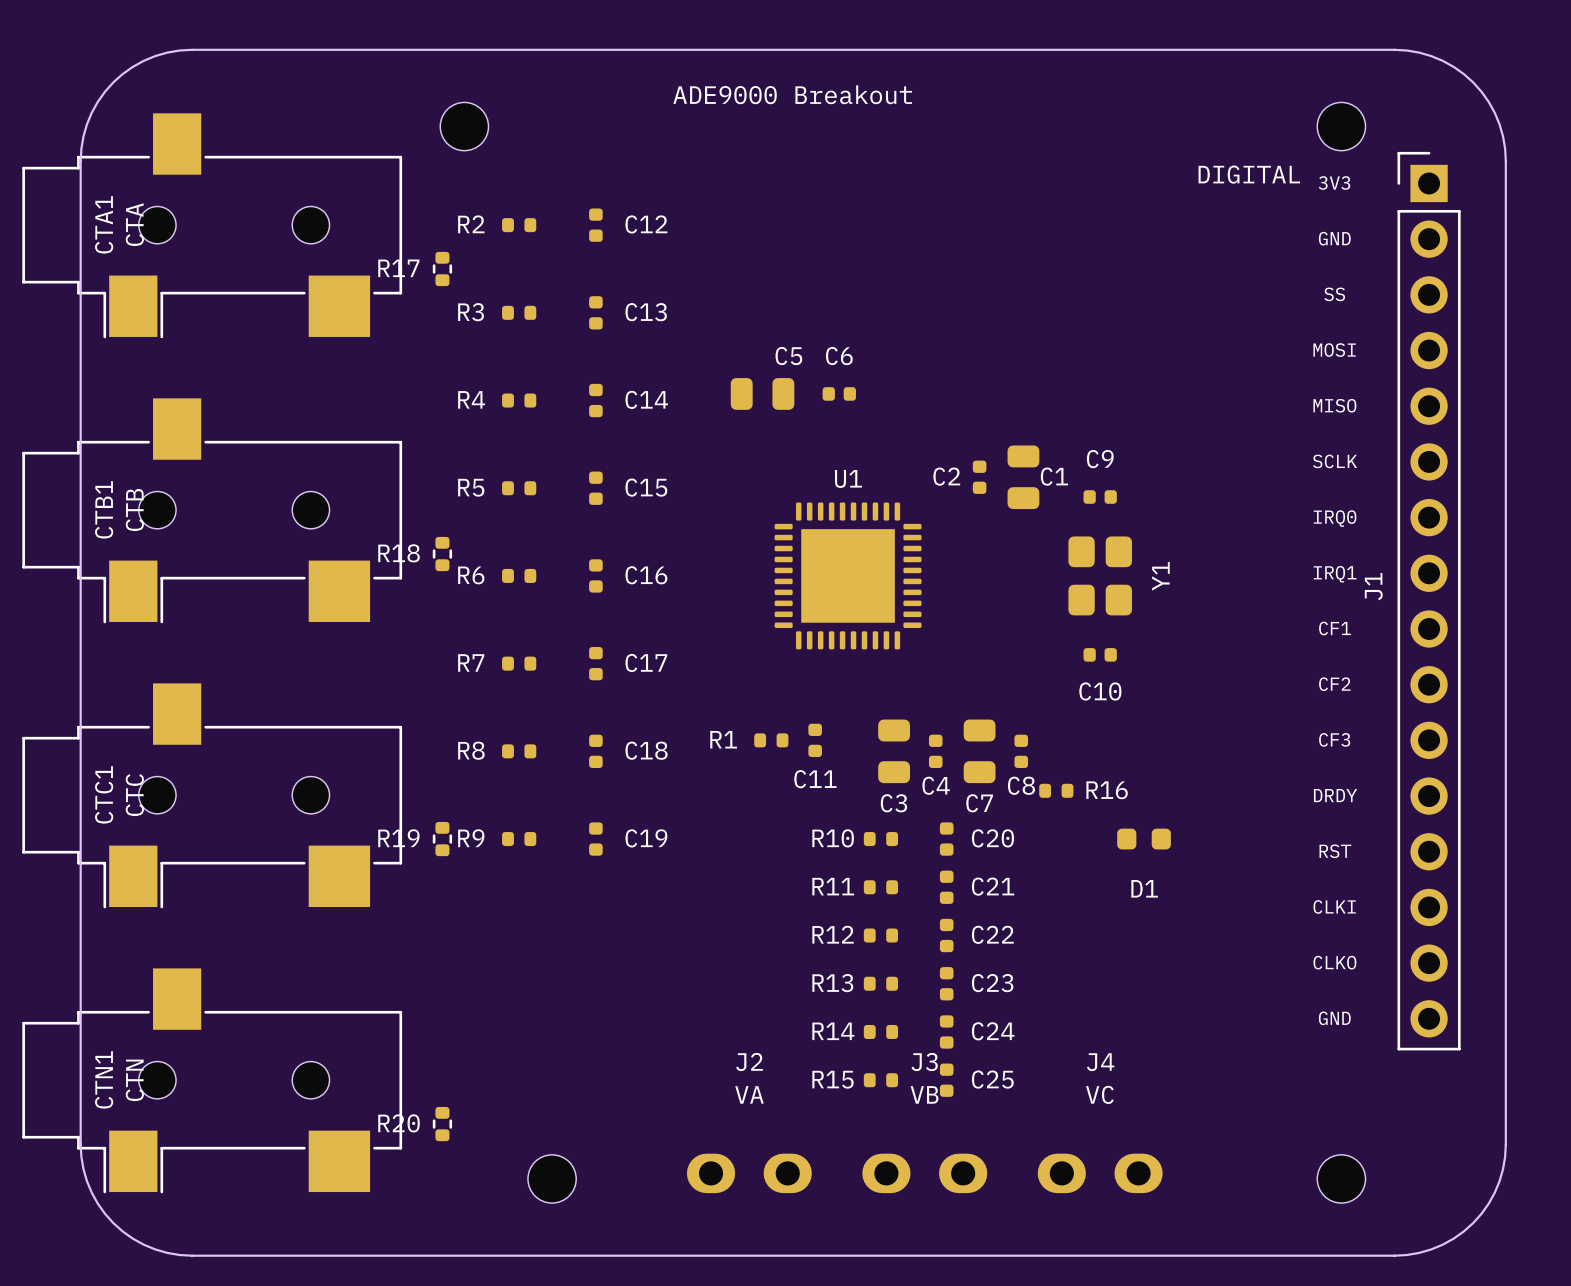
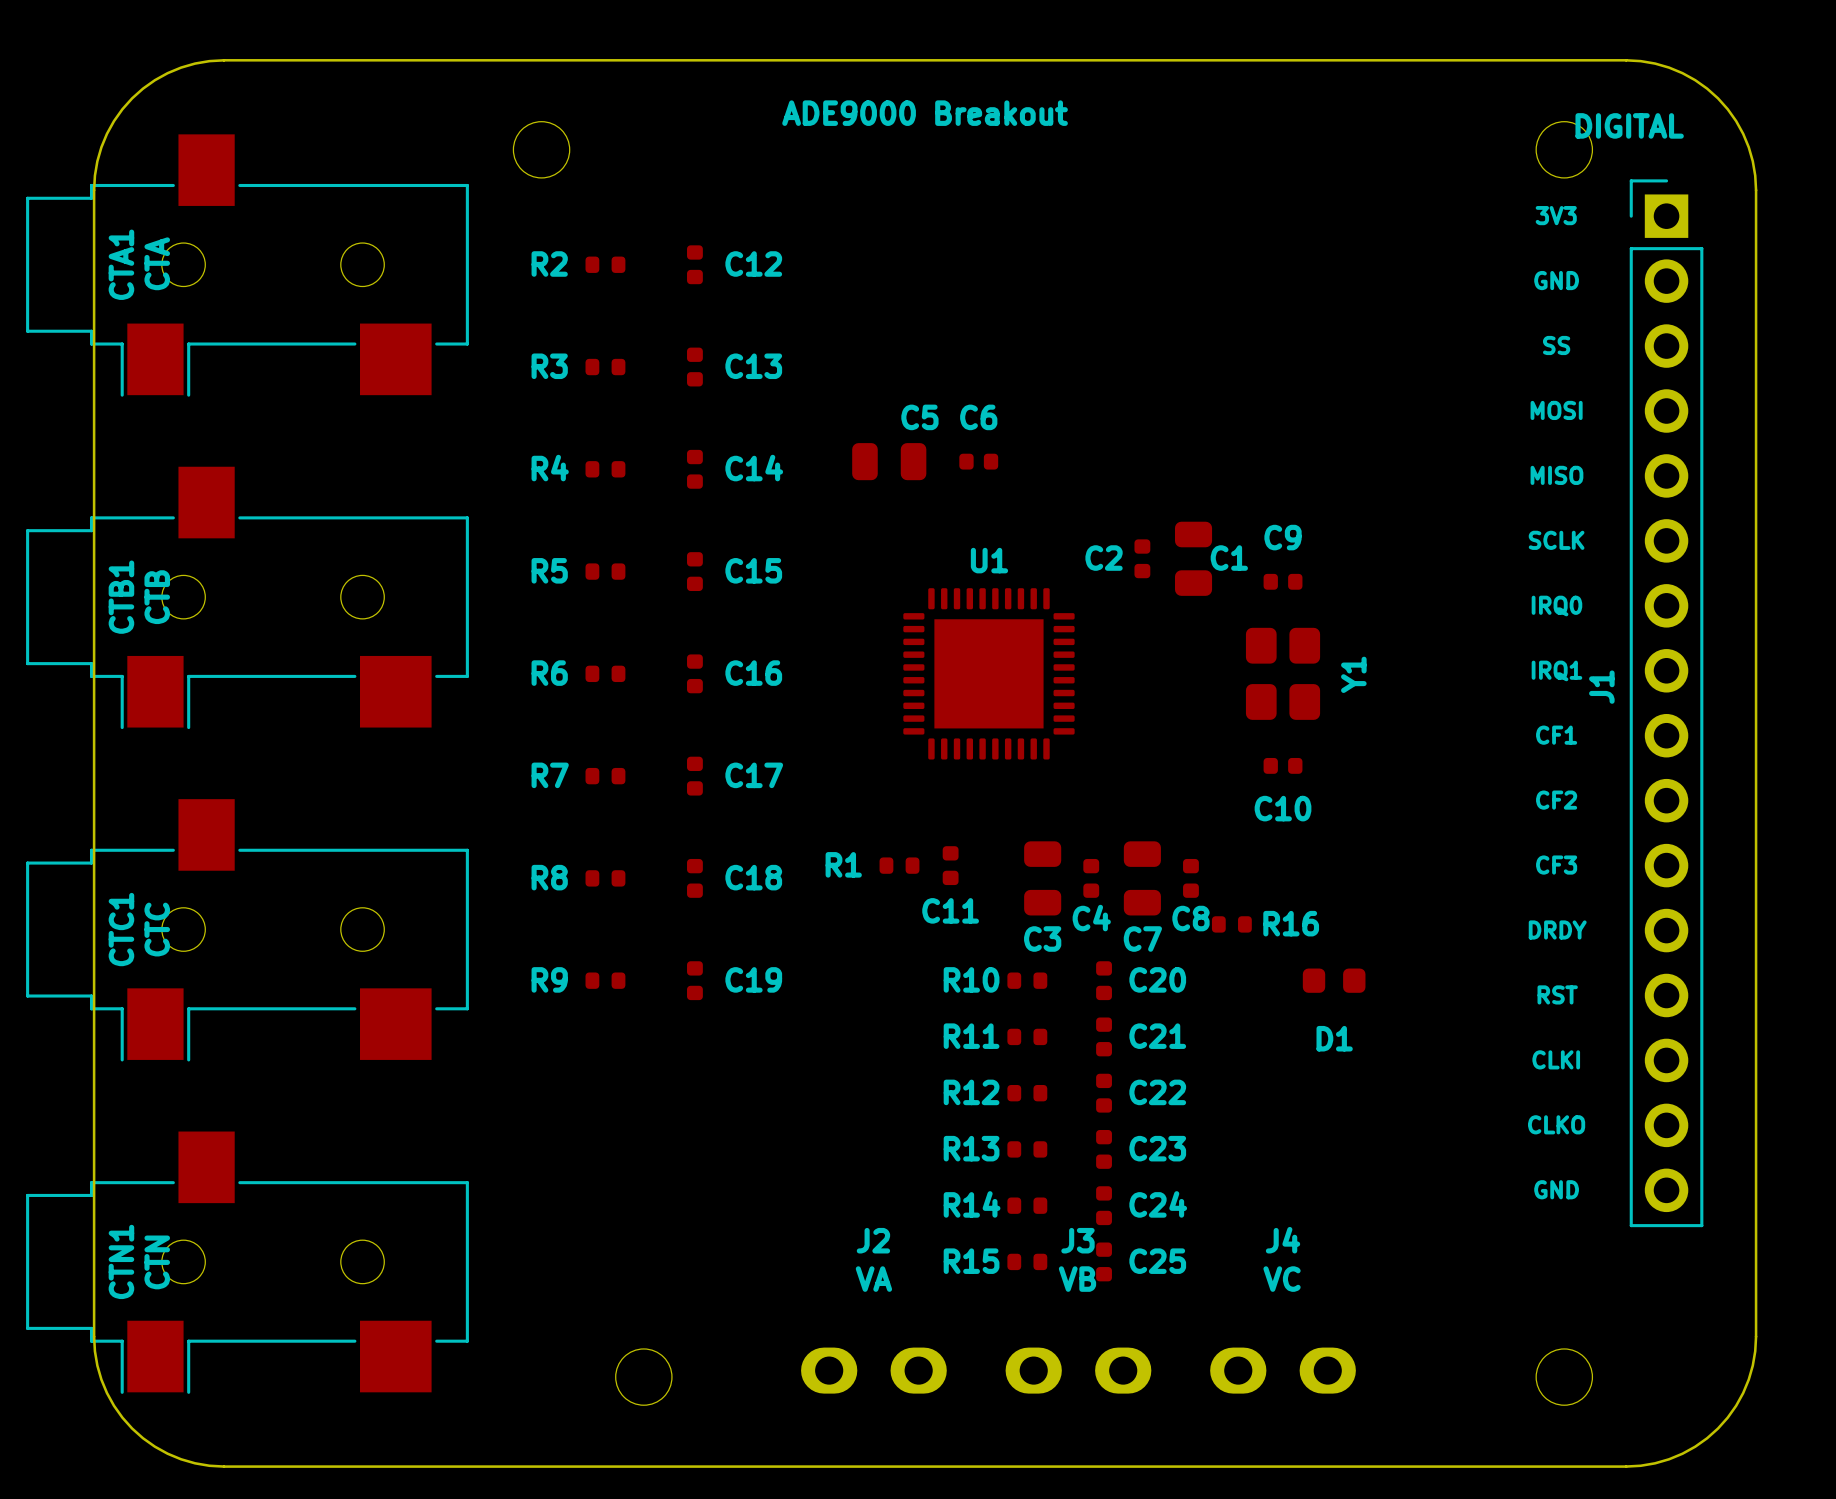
text position: DIGITAL (1249, 174) -> DIGITAL (1629, 125)
R17: (442, 268) -> none
R18: (442, 554) -> none
R19: (442, 839) -> none
R20: (442, 1124) -> none

